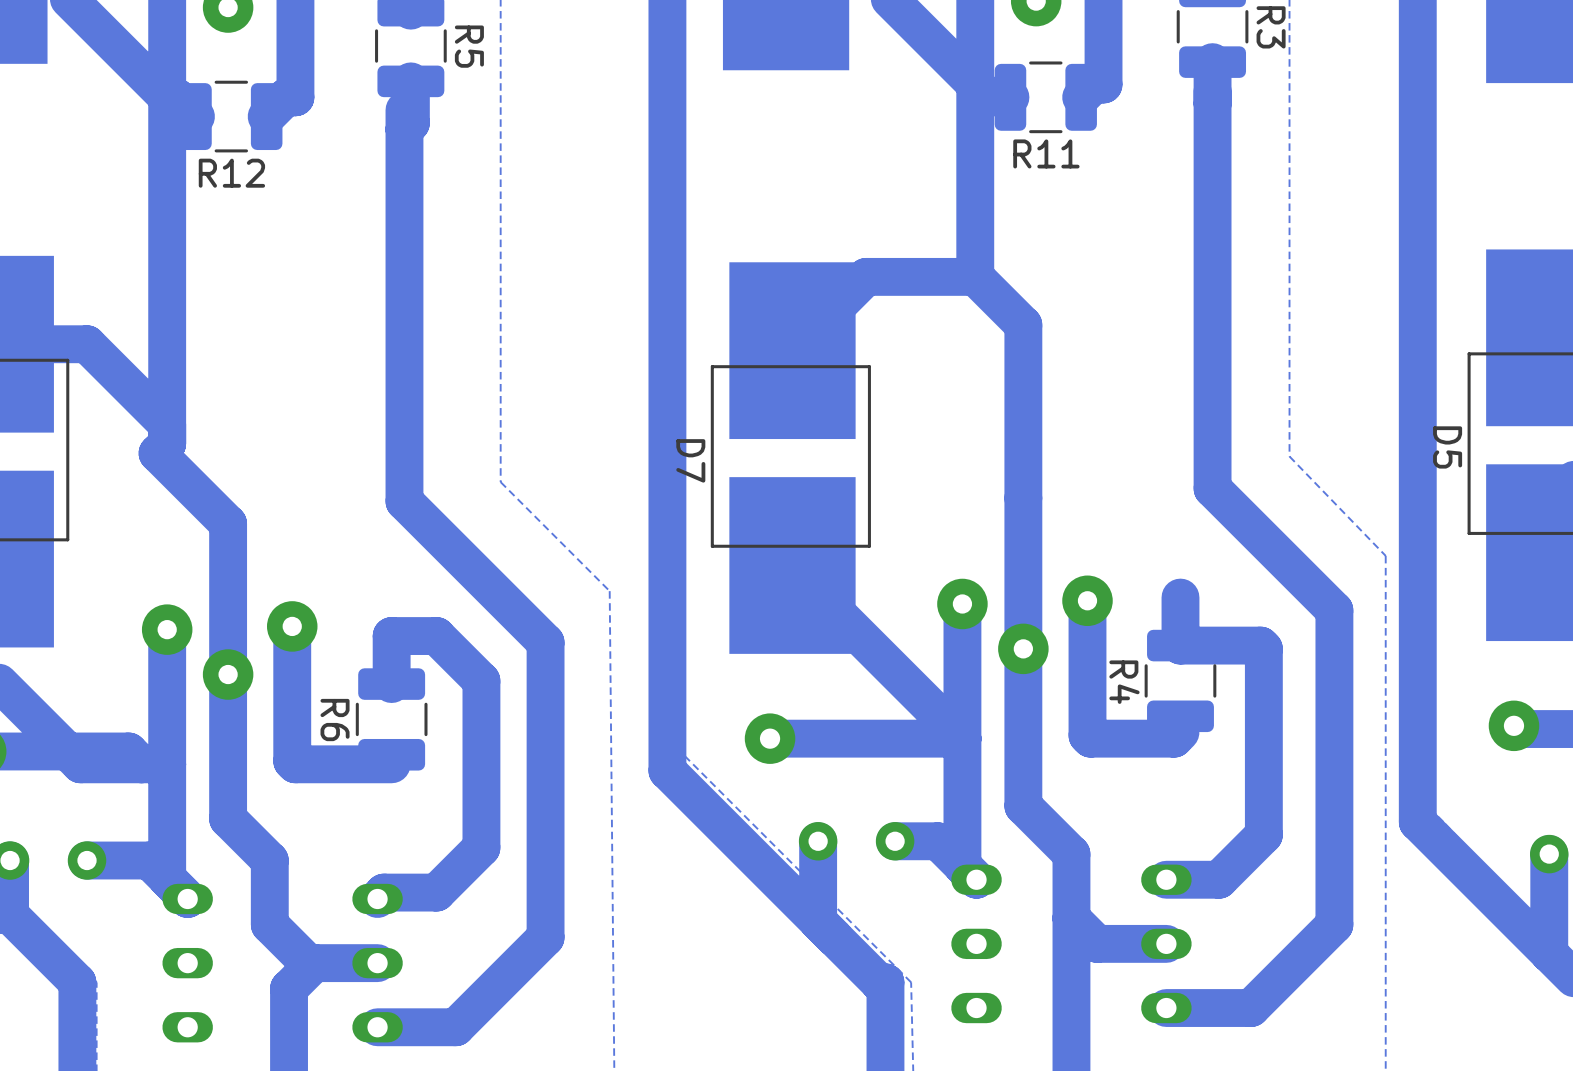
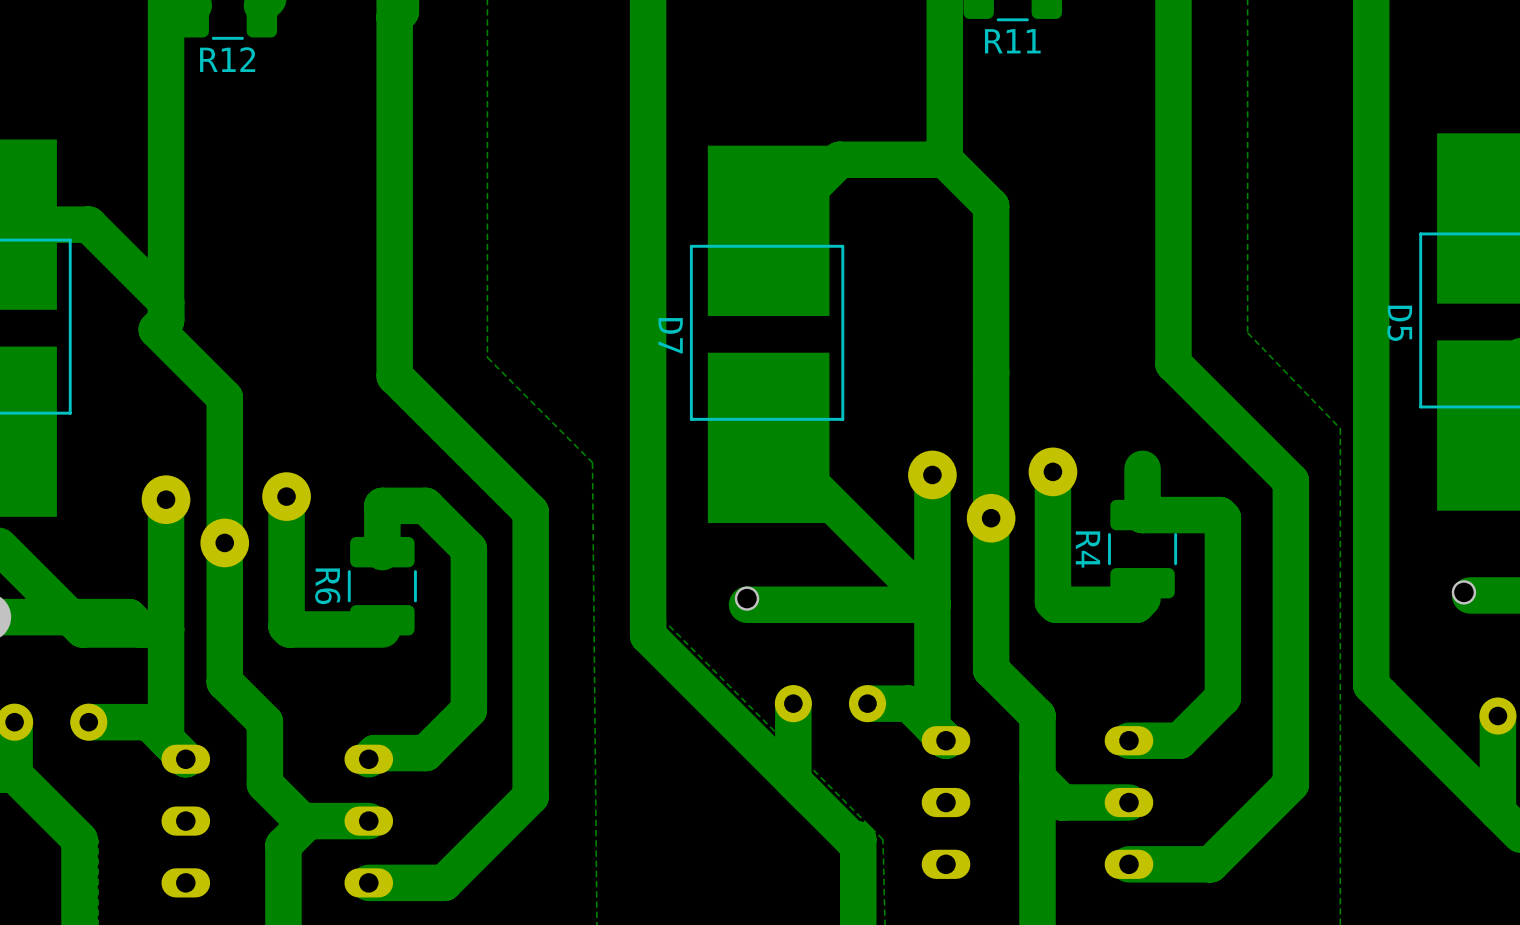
via size: [1488, 700, 1540, 752] -> [1451, 580, 1477, 605]
via size: [744, 713, 796, 764] -> [734, 586, 760, 611]

